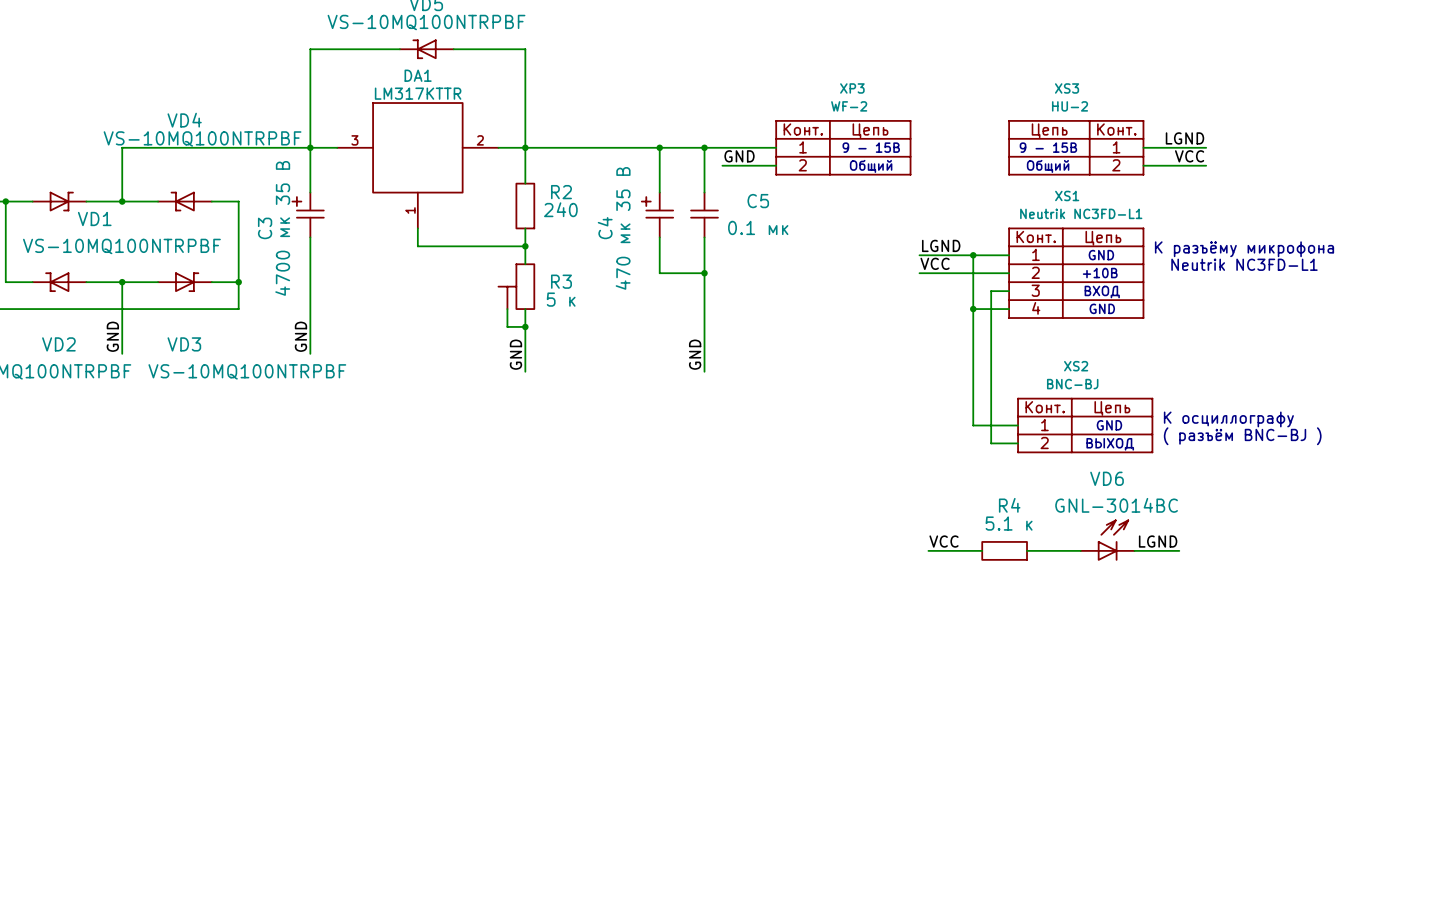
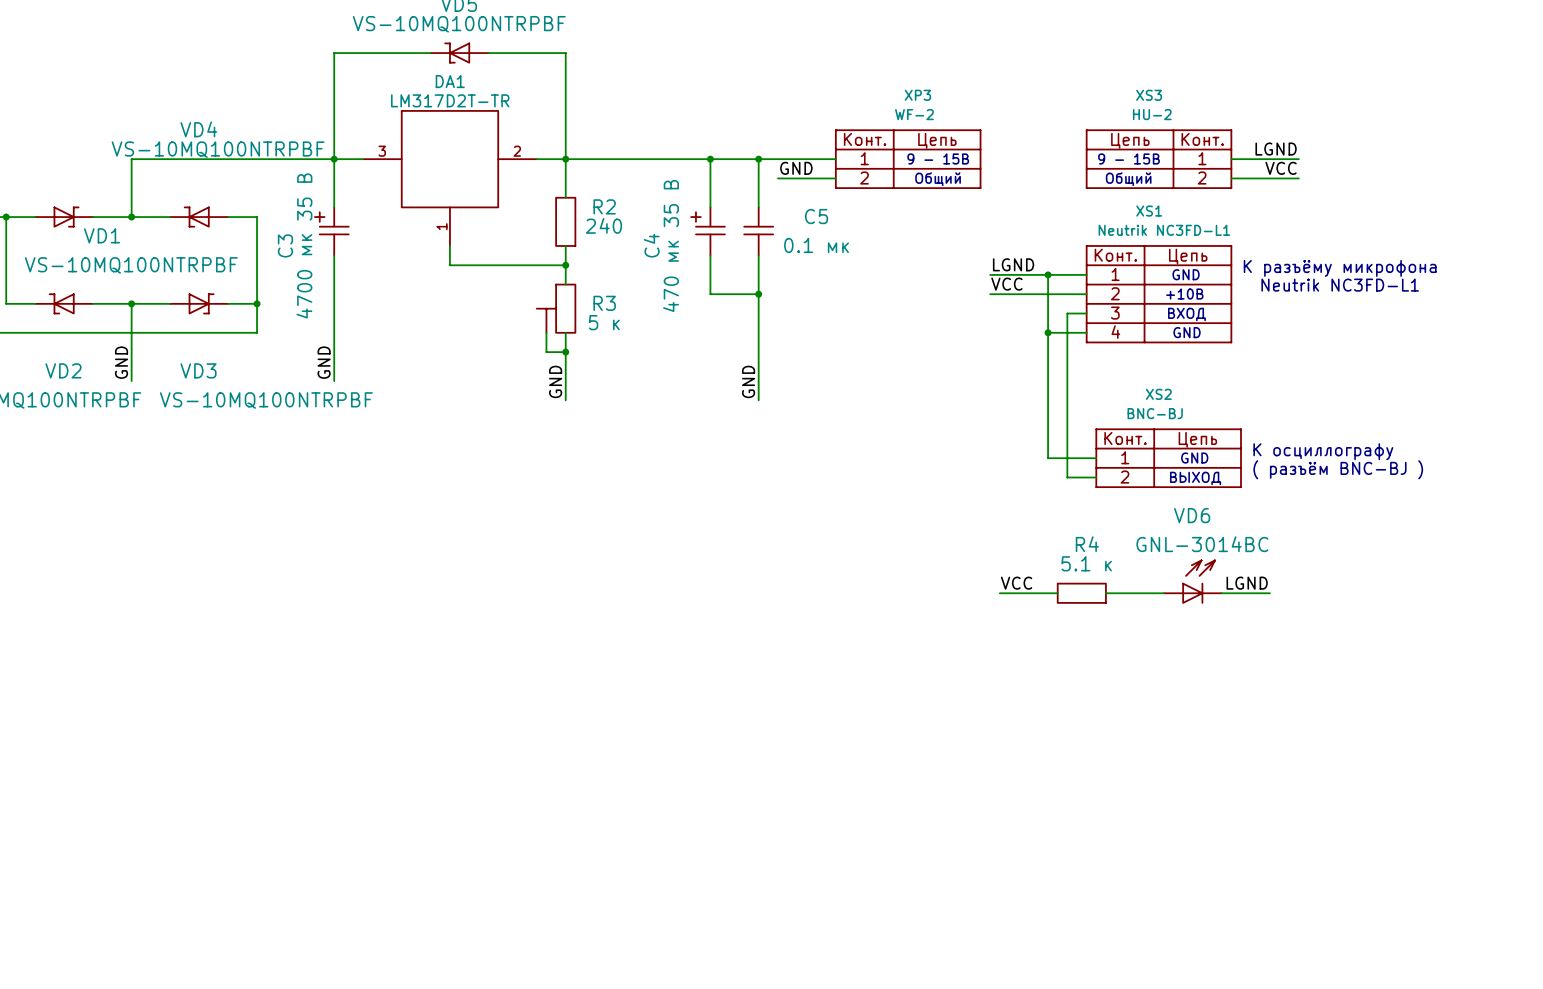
DA1 value: LM317KTTR (418, 93) -> LM317D2T-TR (450, 100)

